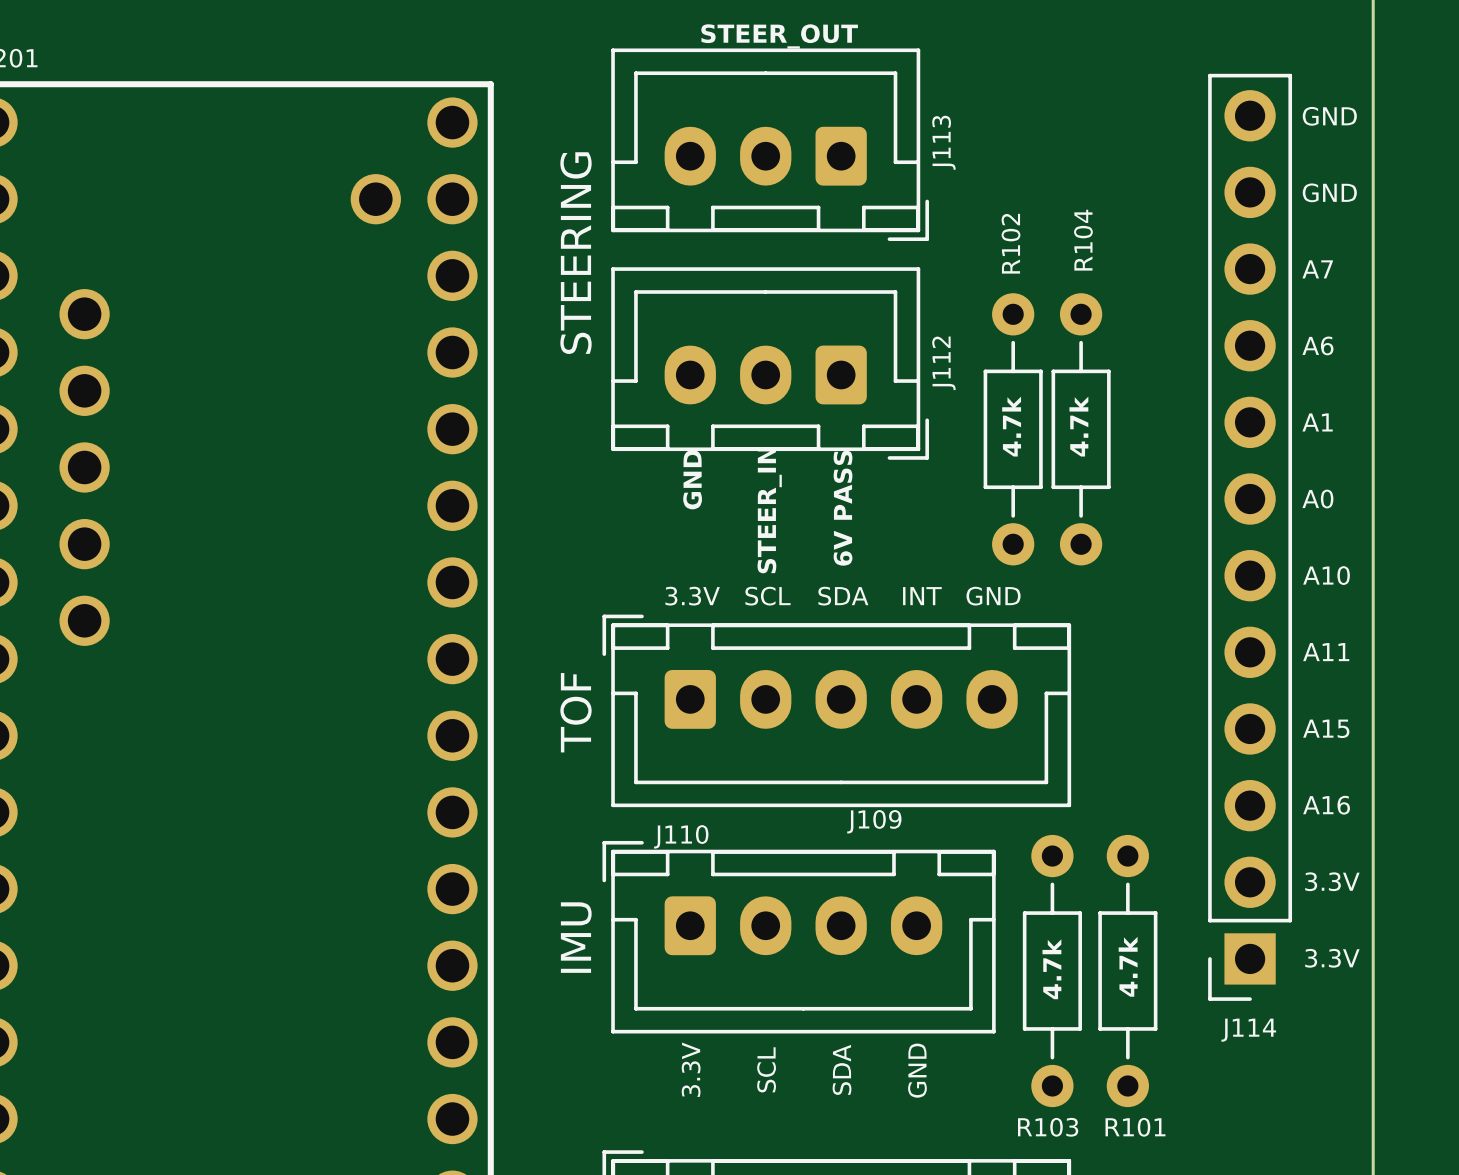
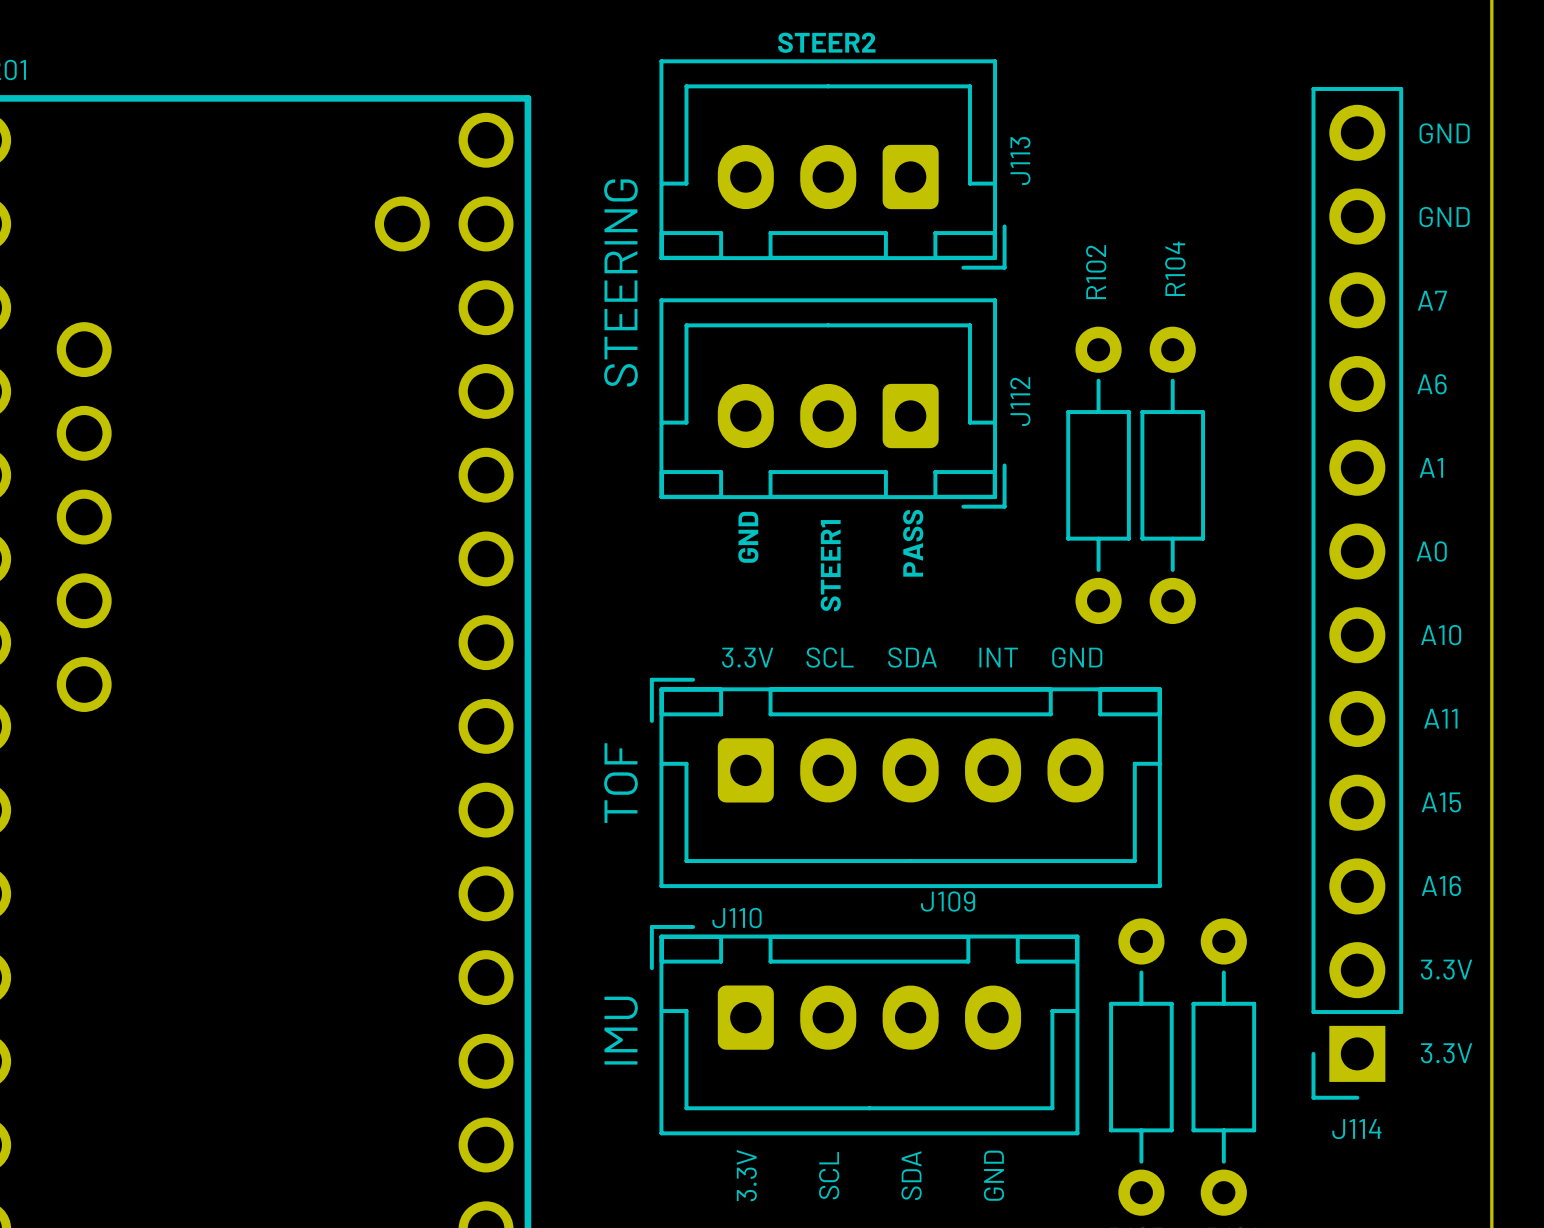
text: STEER_OUT (779, 36) -> STEER2 (826, 42)
text: 4.7k (1011, 426) -> none
text: 4.7k (1078, 426) -> none
text: 6V PASS (843, 508) -> PASS (913, 543)
text: STEER_IN (769, 510) -> STEER1 (830, 565)
text: 4.7k (1128, 966) -> none
text: 4.7k (1051, 969) -> none

